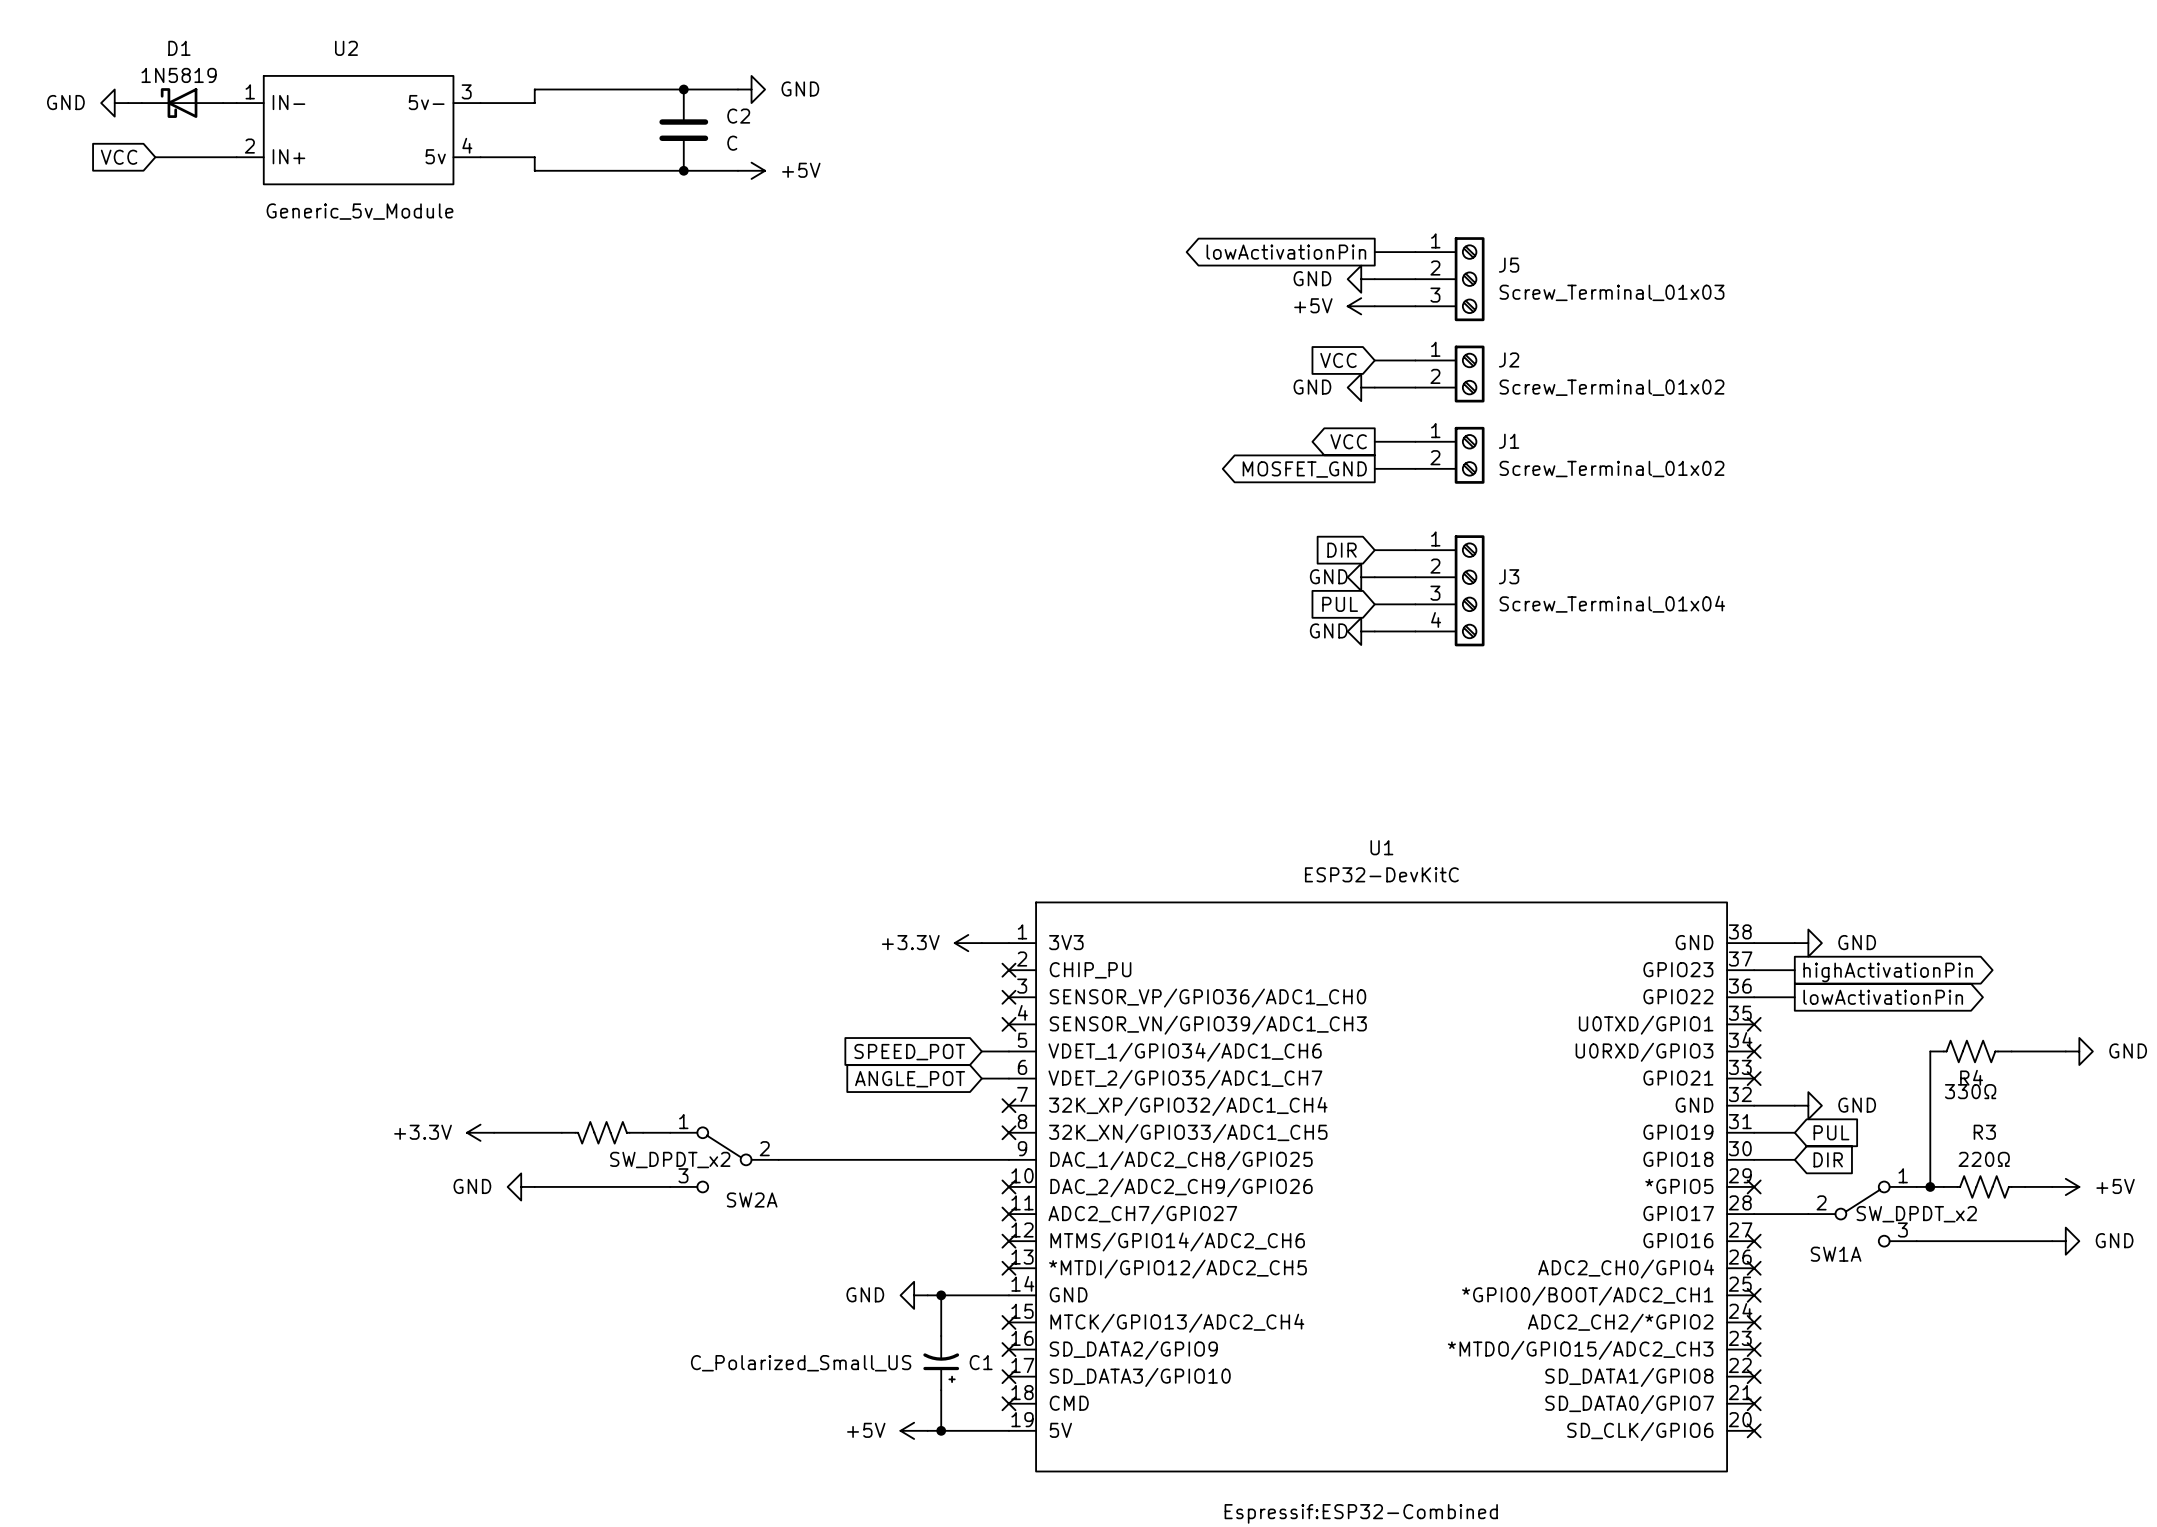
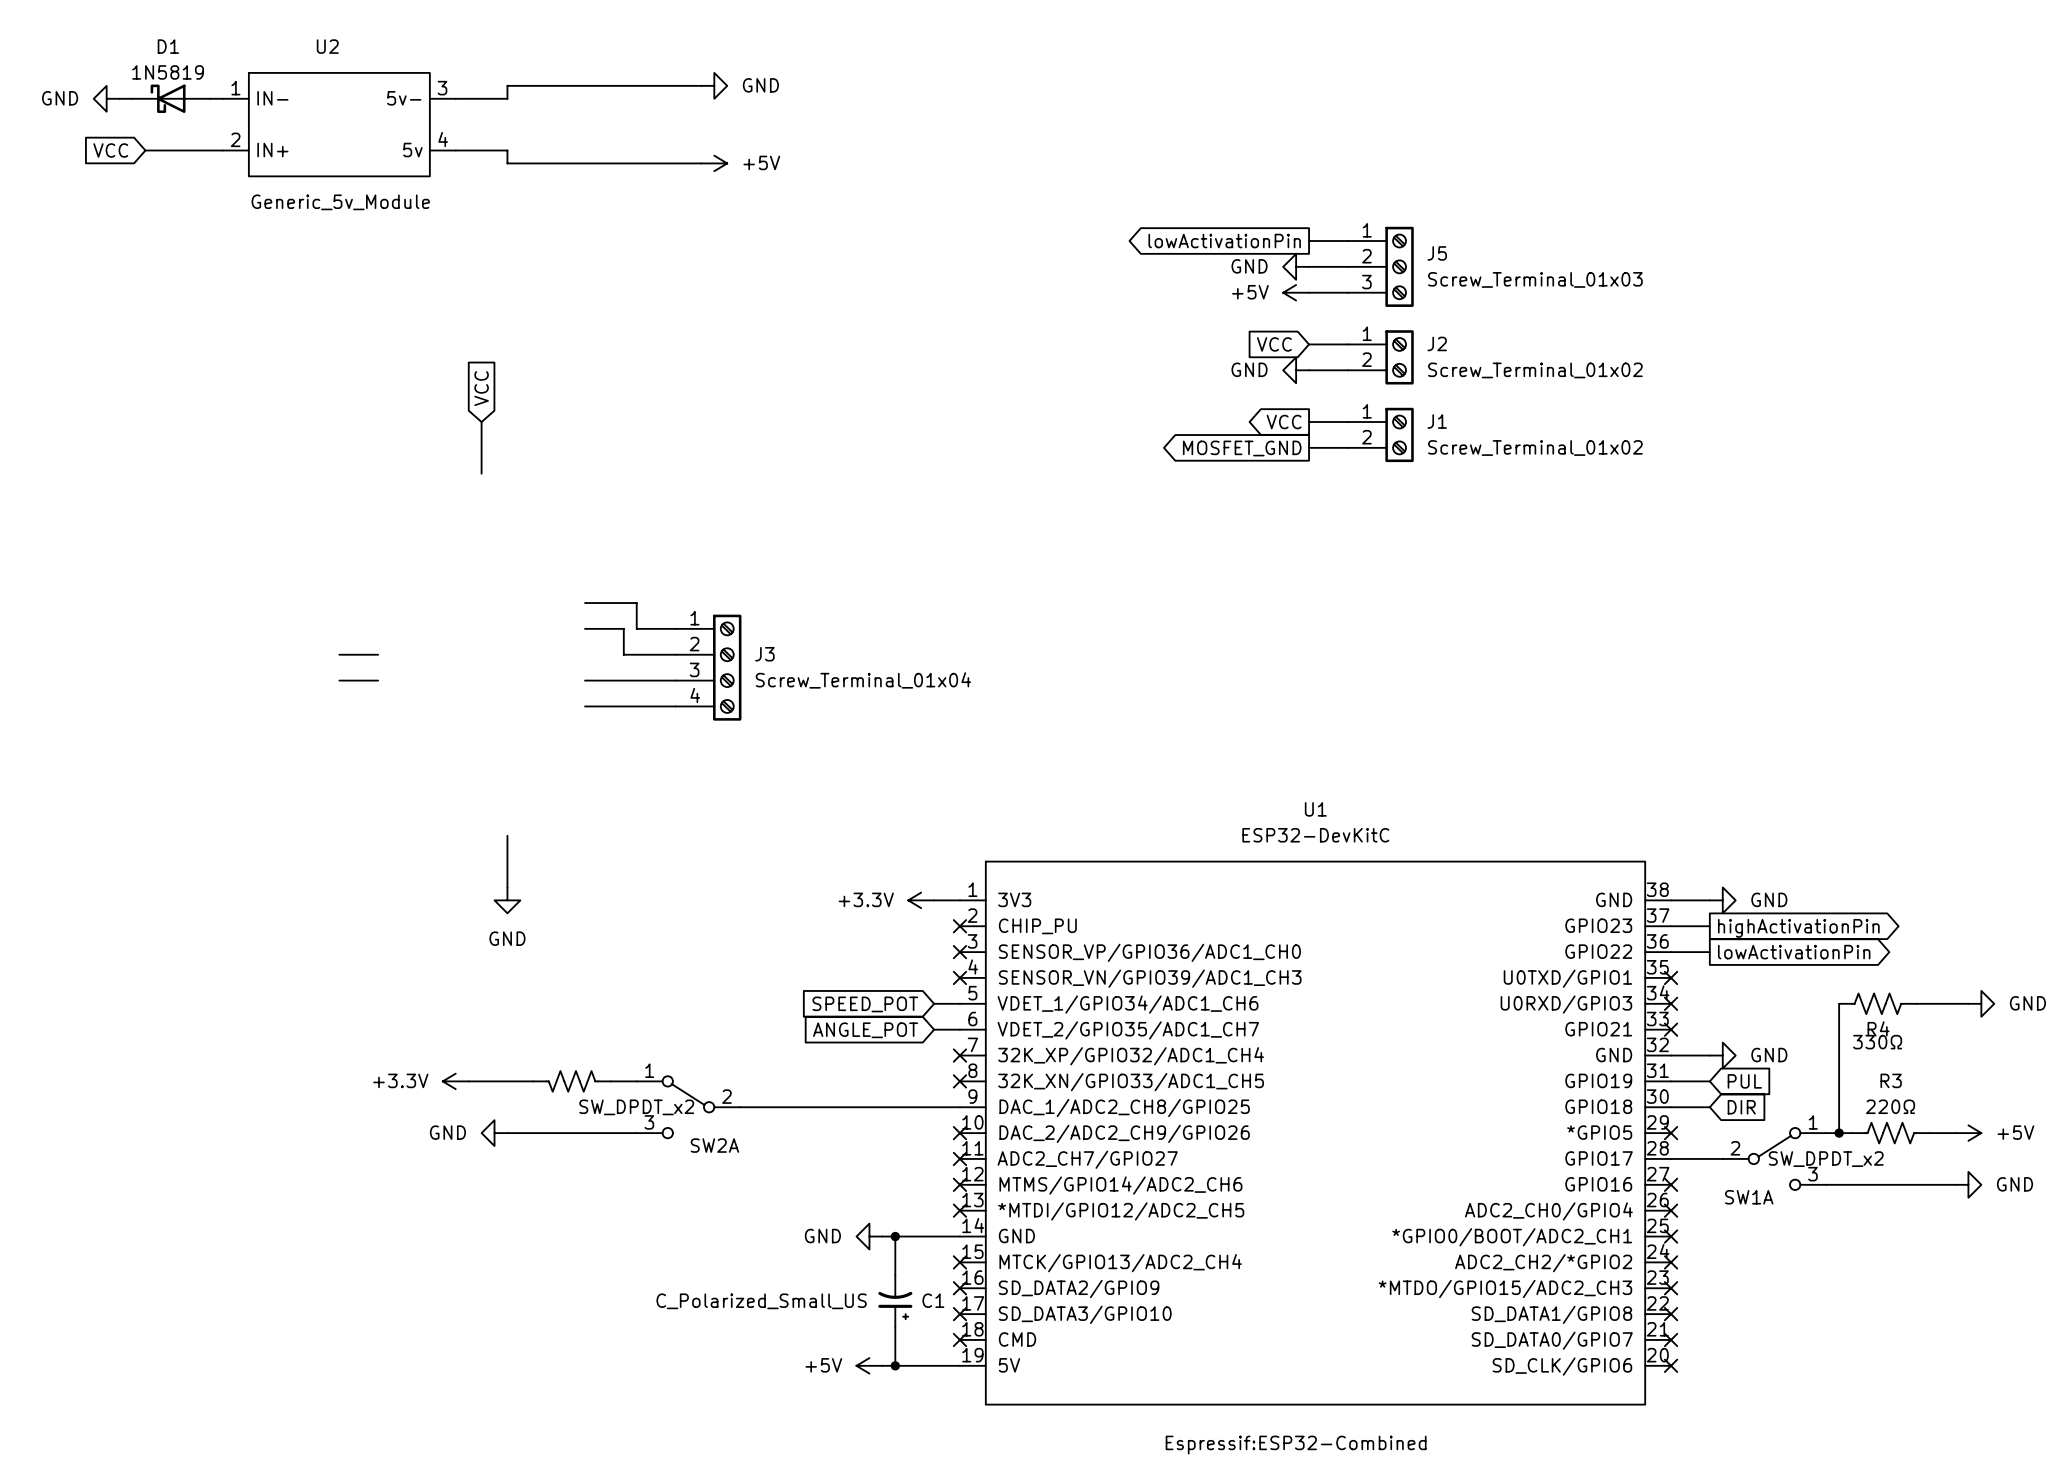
junction: (683, 89) -> none
C2: C (683, 130) -> none
junction: (683, 170) -> none
global label: none -> VCC (481, 388)
wire: none -> (481, 422) (481, 473)
global label: DIR (1342, 550) -> none
wire: (1374, 550) (1415, 550) -> none
power symbol: GND (1361, 577) -> none
wire: (1374, 577) (1415, 577) -> none
J3 position: (1449, 590) -> (708, 667)
global label: PUL (1340, 604) -> none
wire: (1374, 604) (1415, 604) -> none
wire: none -> (585, 603) (636, 603) (636, 628) (675, 628)
power symbol: GND (1361, 631) -> none
wire: (1374, 631) (1415, 631) -> none
wire: none -> (585, 628) (623, 628) (623, 654) (675, 654)
wire: none -> (339, 654) (378, 654)
wire: none -> (339, 680) (378, 680)
wire: none -> (585, 680) (675, 680)
wire: none -> (585, 706) (675, 706)
wire: none -> (507, 835) (507, 887)
power symbol: none -> GND (507, 900)

